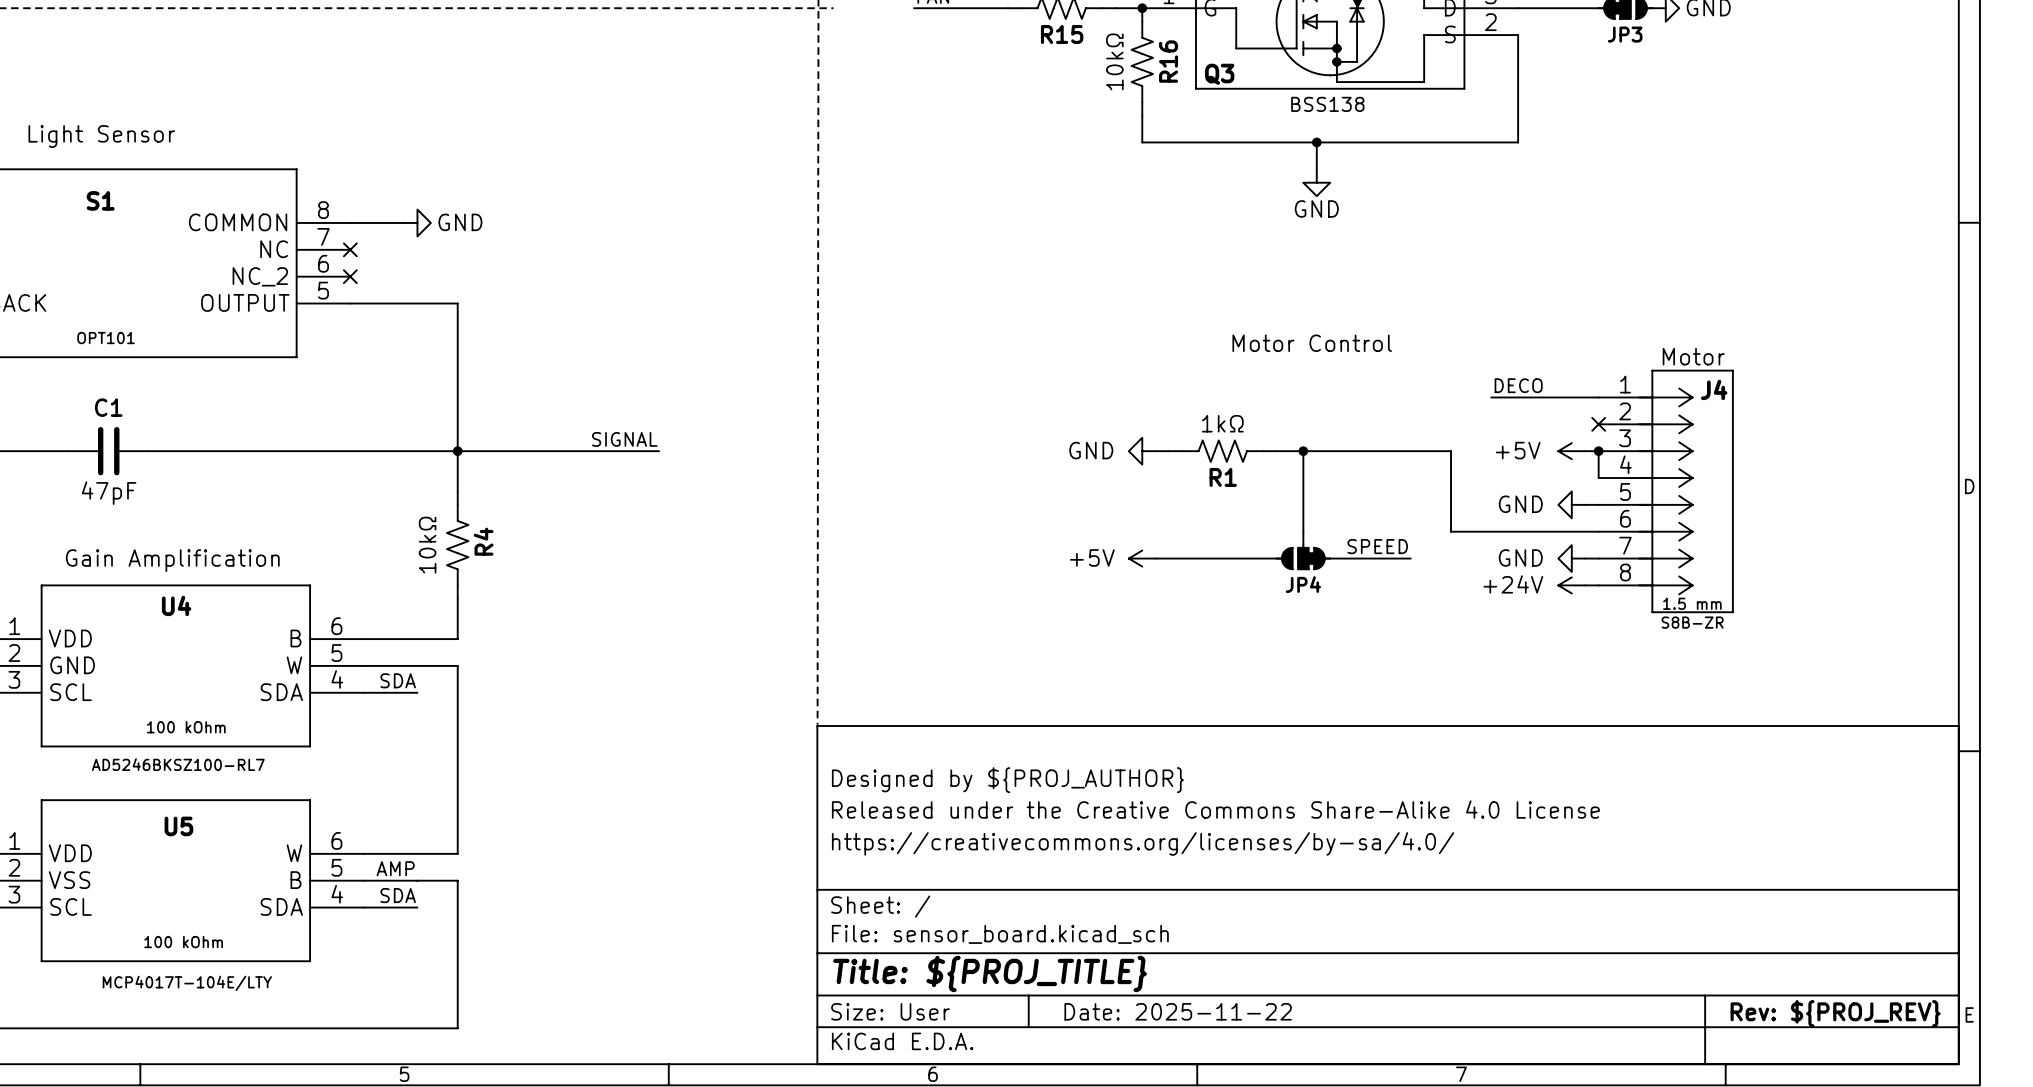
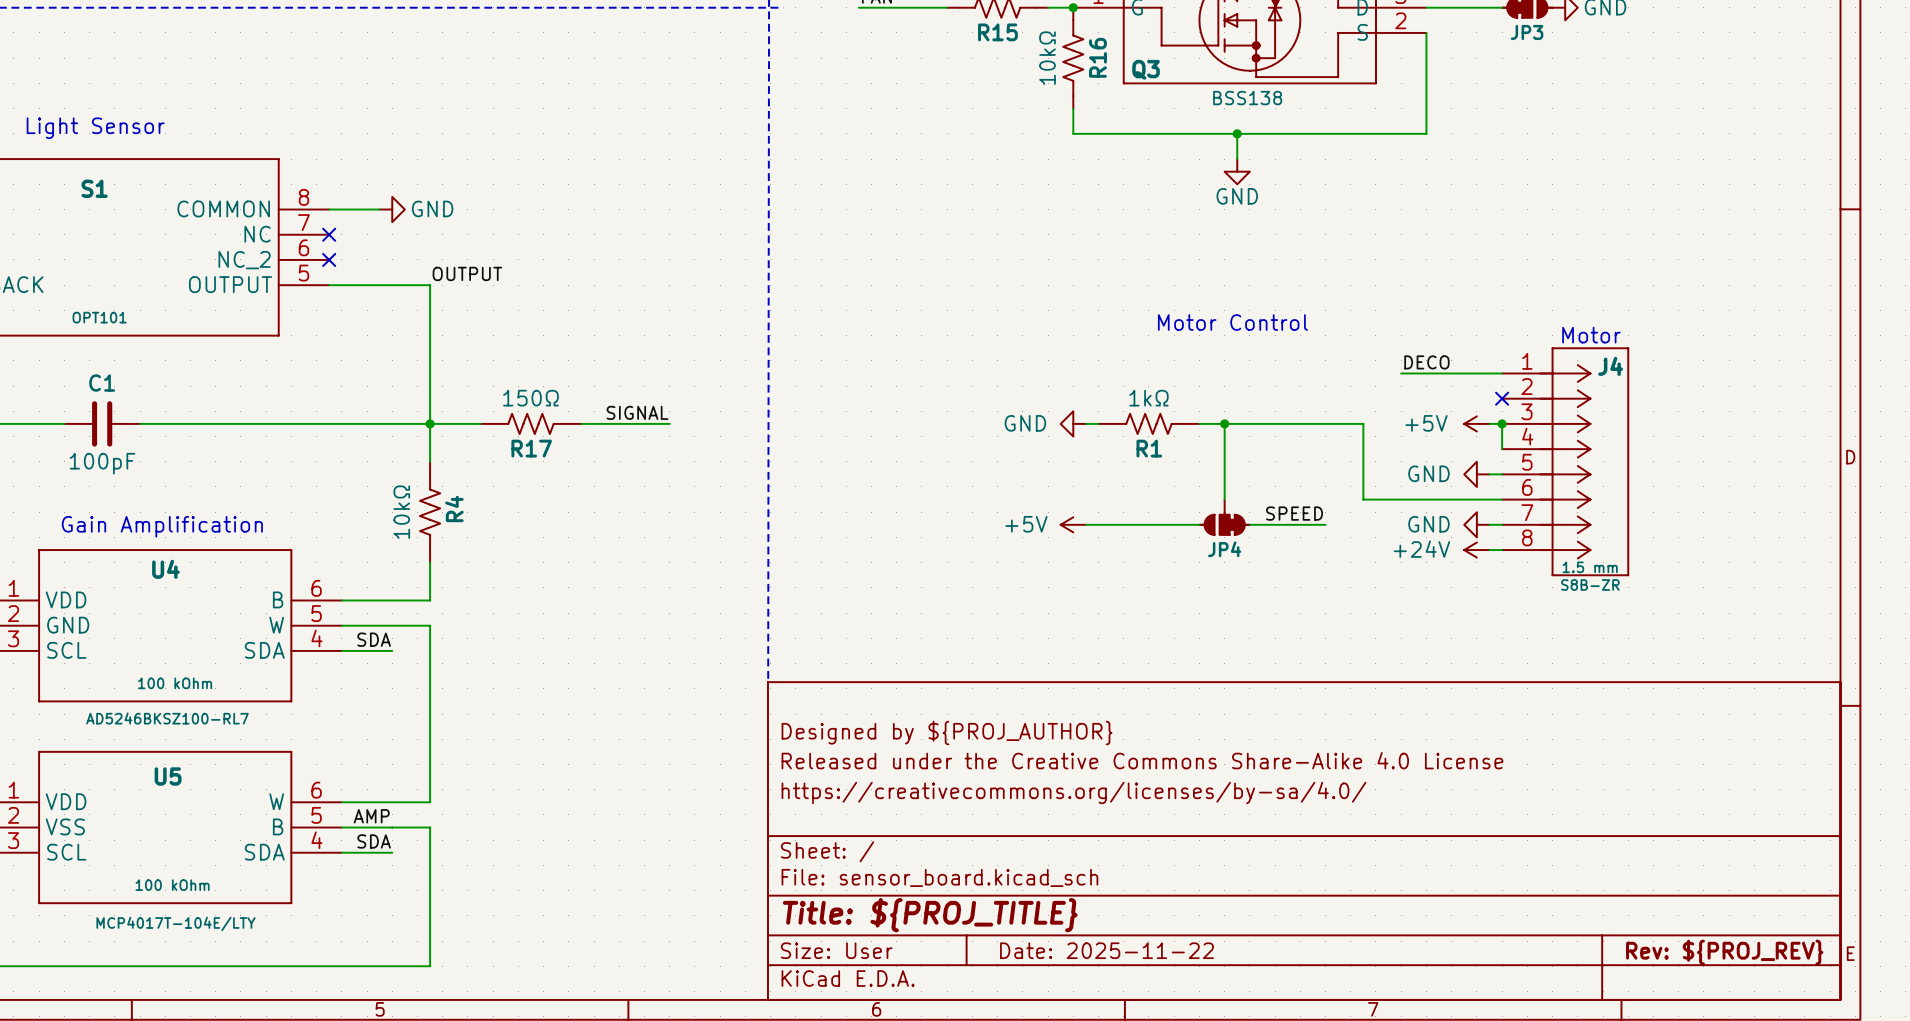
label: none -> OUTPUT (467, 273)
label position: SIGNAL (624, 439) -> SIGNAL (637, 412)
R17: none -> 150Ω (530, 423)
wire: none -> (619, 423) (669, 423)
C1 value: 47pF (109, 493) -> 100pF (102, 463)

